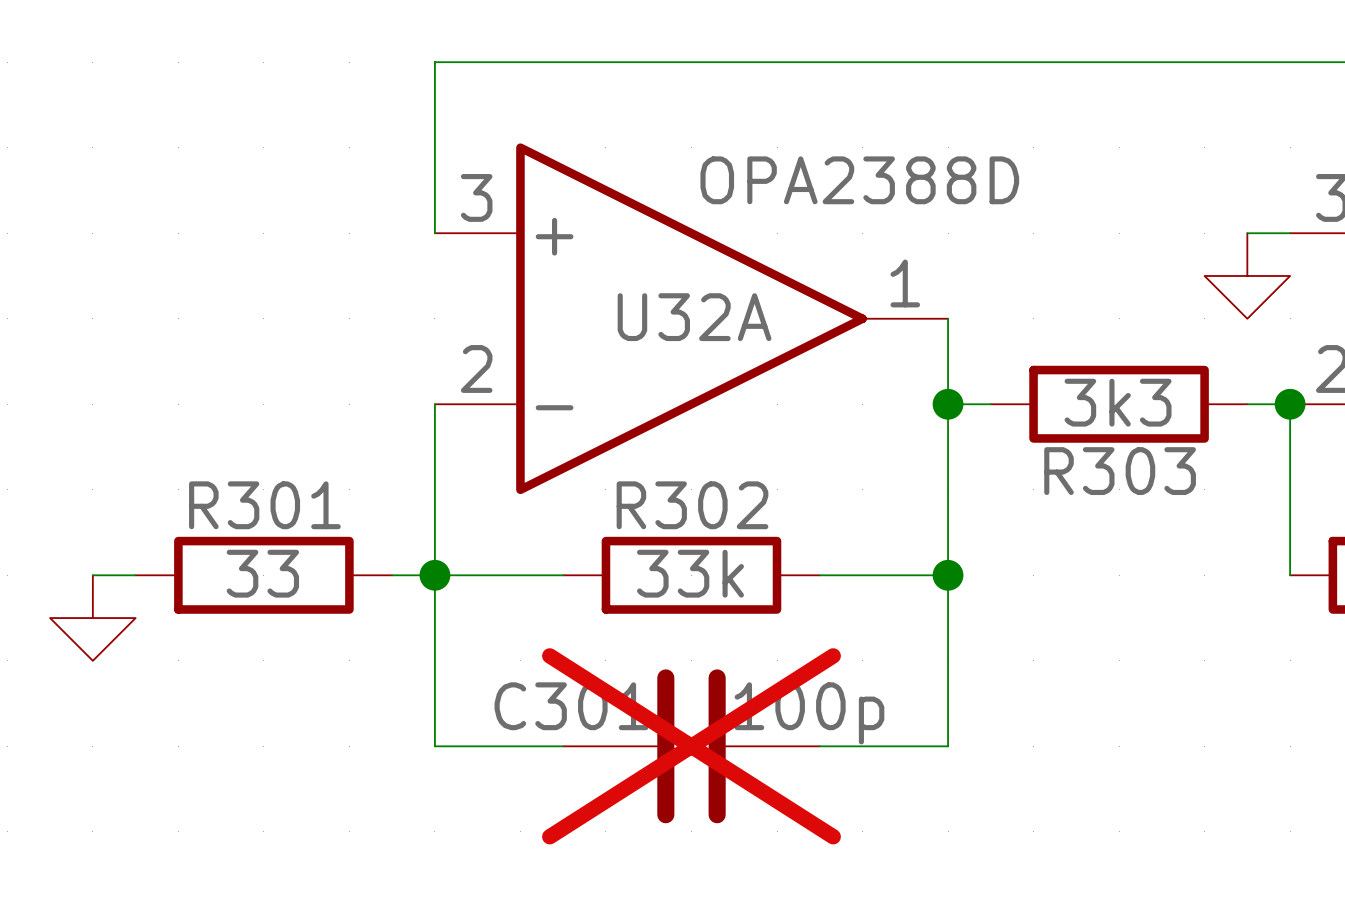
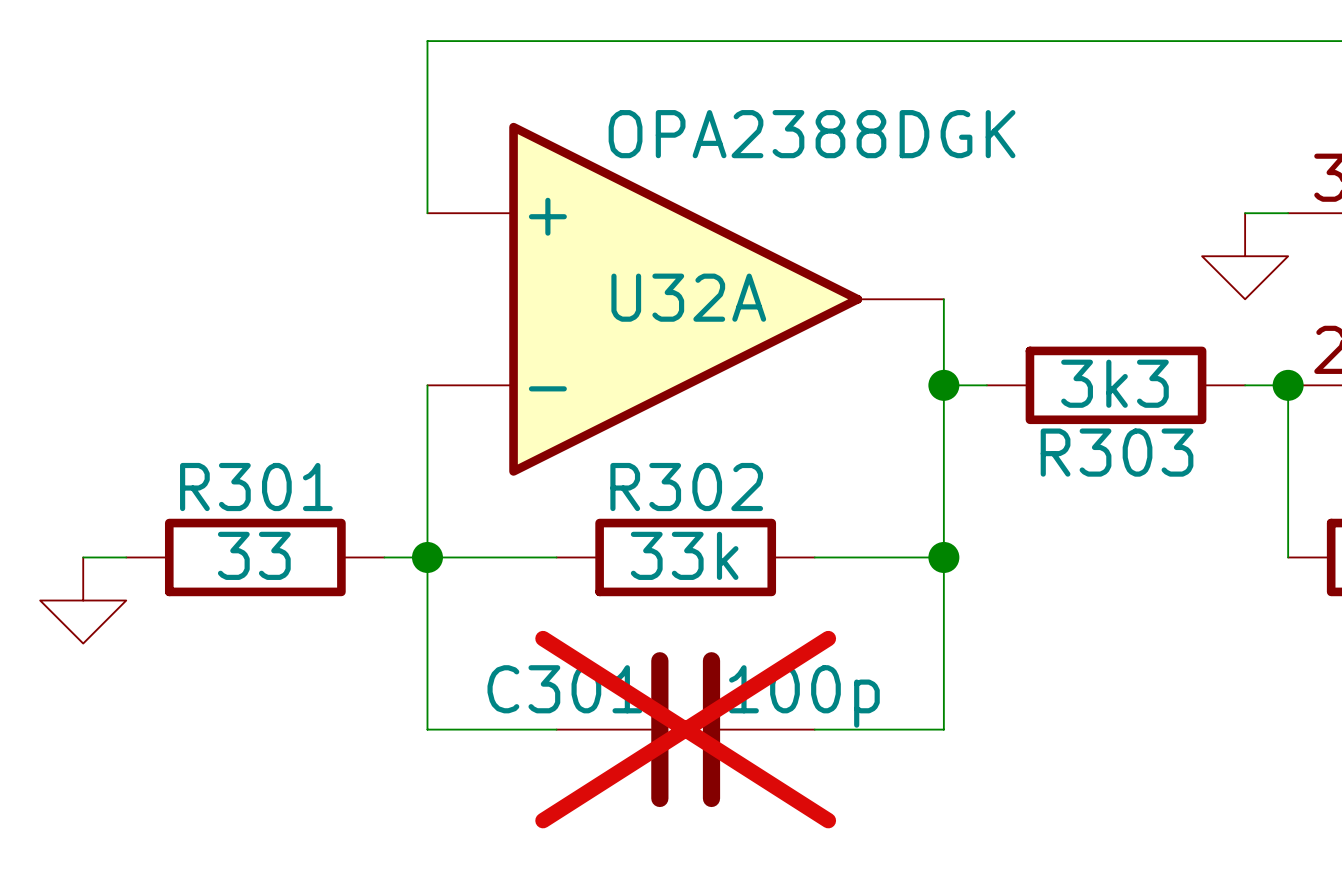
U32A value: OPA2388D (859, 180) -> OPA2388DGK (812, 134)
U32A pin number: 3 (476, 197) -> none
U32A pin number: 1 (905, 283) -> none
U32A pin number: 2 (476, 368) -> none

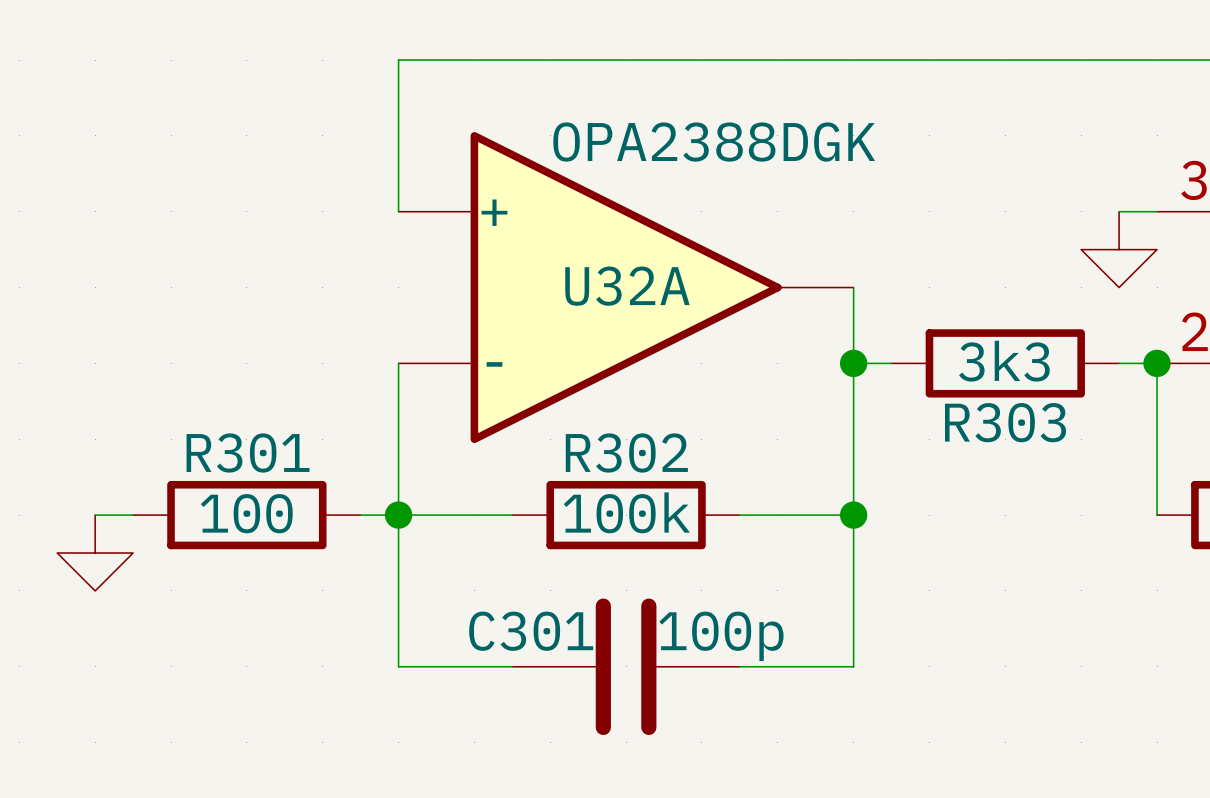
R301 value: 33 (254, 555) -> 100 (246, 513)
R302 value: 33k (684, 555) -> 100k (626, 512)
C301 do-not-place cross: (685, 729) -> none

